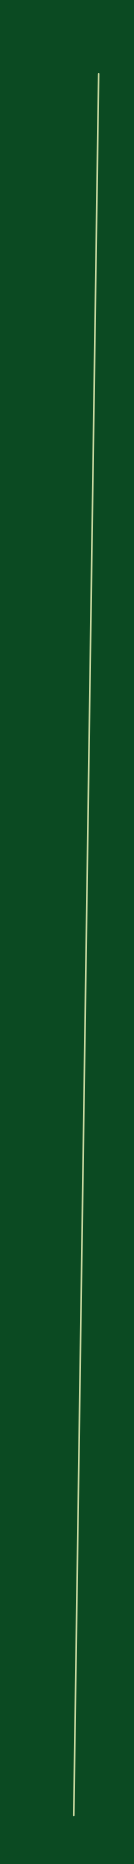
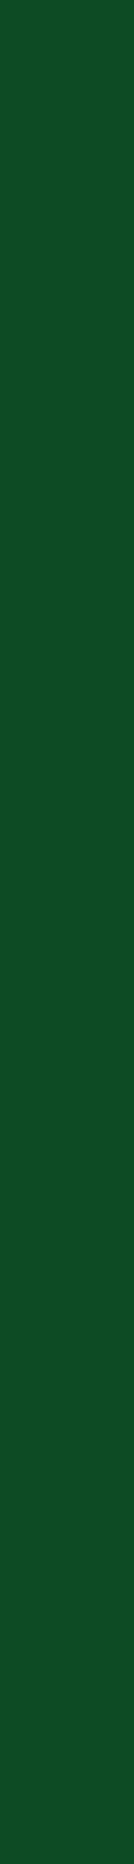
board edge: (98, 73) (73, 1815) -> none

